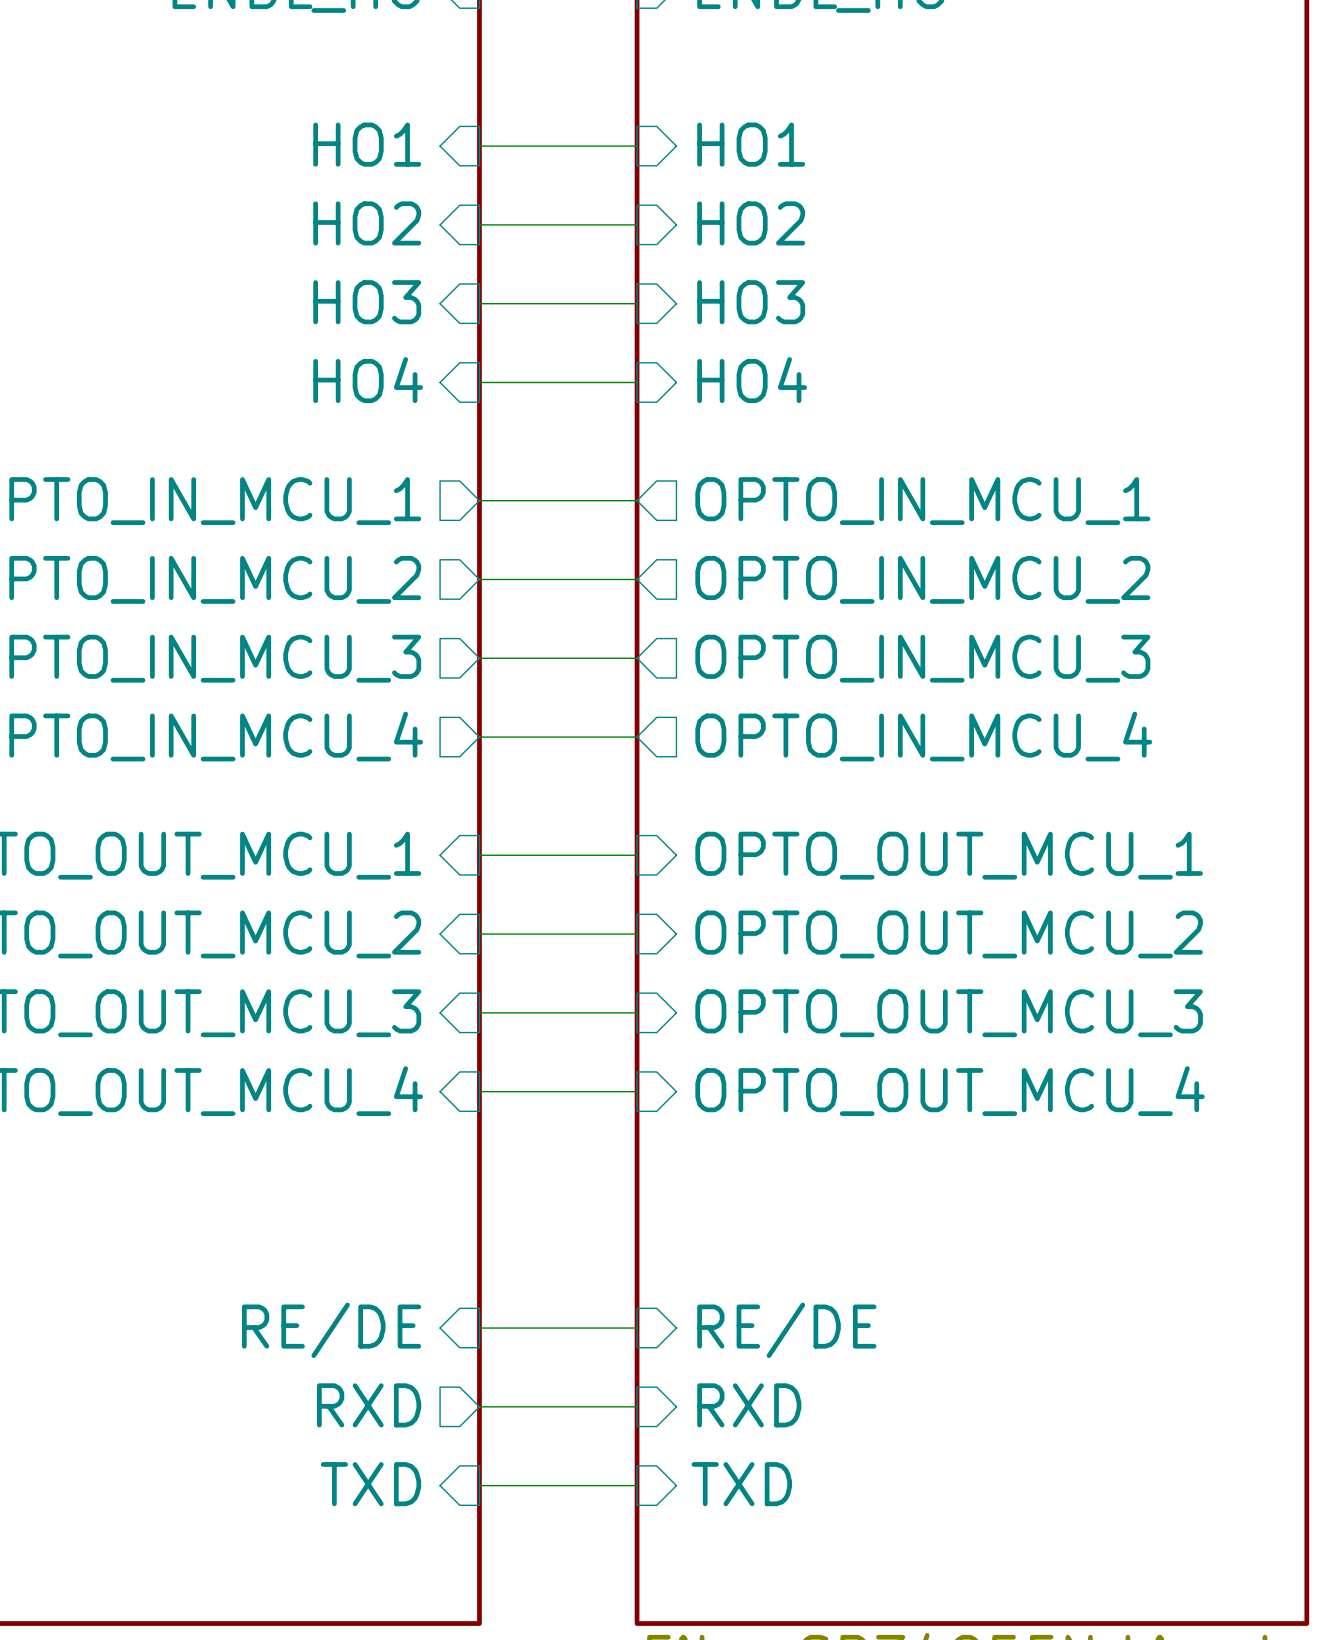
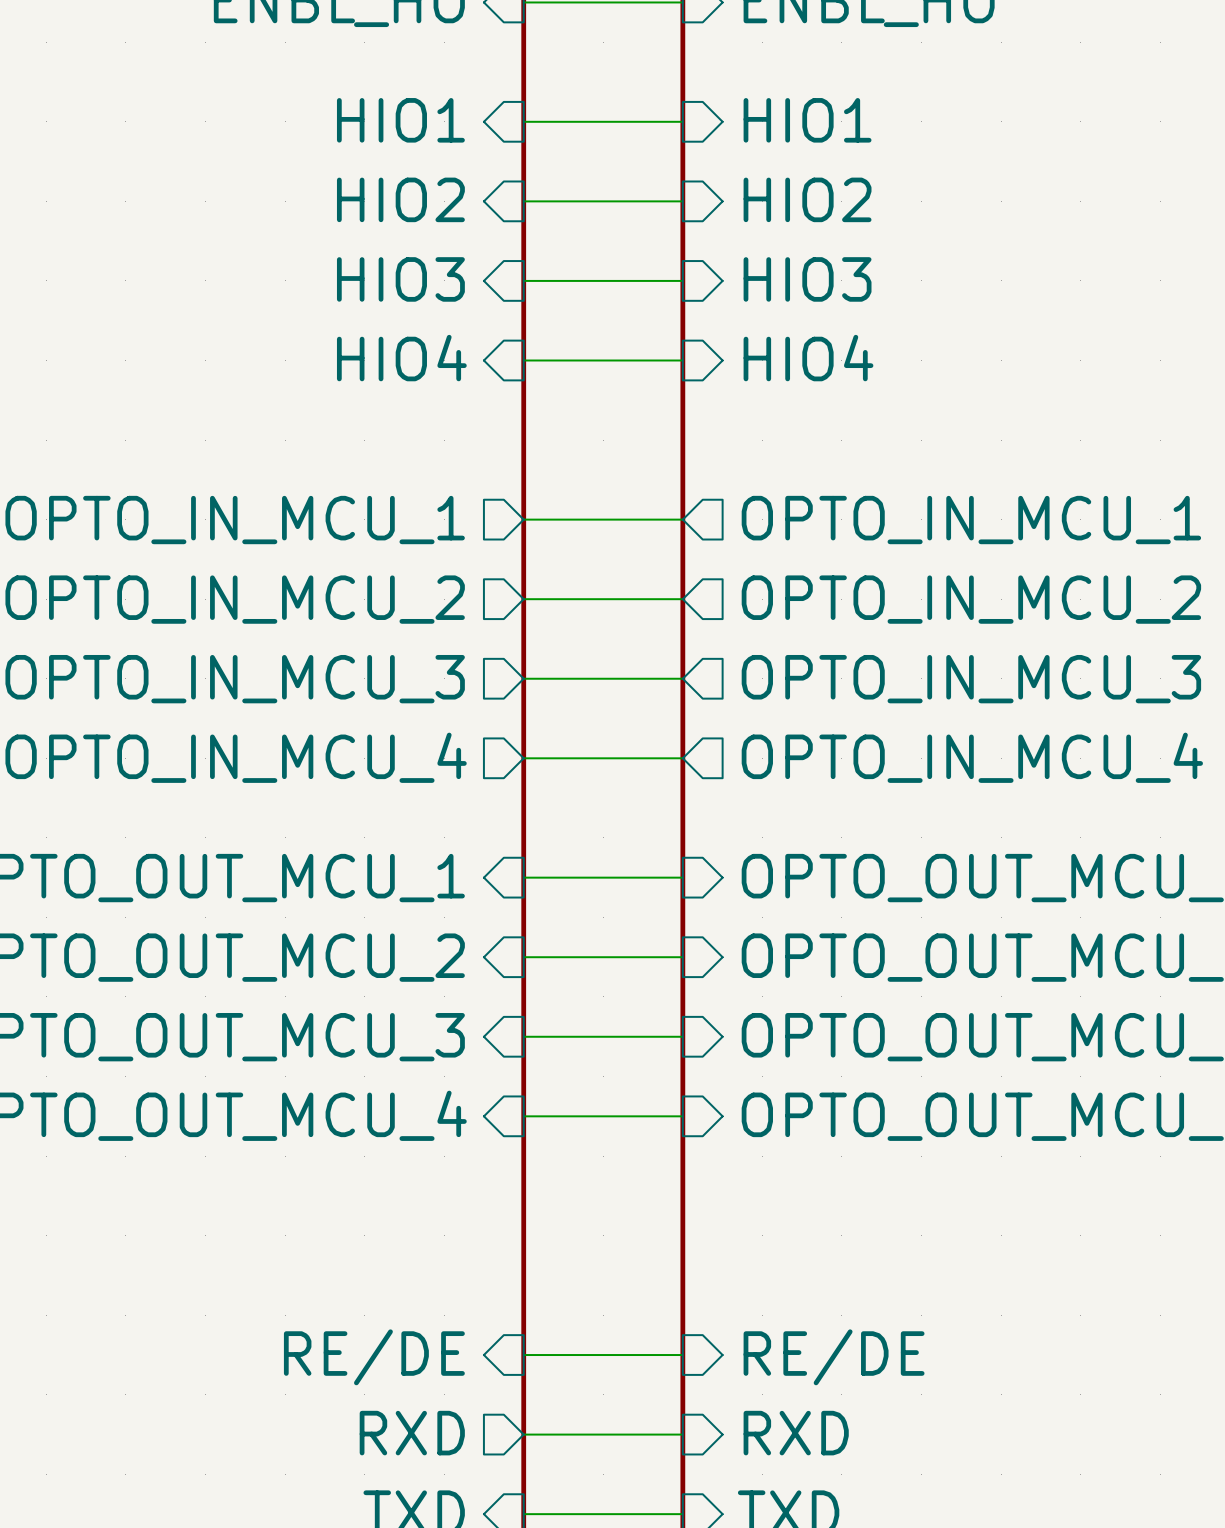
sheet pin: HO1 (367, 144) -> HIO1 (400, 120)
sheet pin: HO1 (751, 144) -> HIO1 (807, 120)
wire: (479, 146) (637, 146) -> (523, 121) (682, 121)
sheet pin: HO2 (367, 223) -> HIO2 (400, 199)
sheet pin: HO2 (751, 223) -> HIO2 (807, 199)
wire: (479, 224) (637, 224) -> (523, 201) (682, 201)
sheet pin: HO3 (367, 302) -> HIO3 (400, 279)
sheet pin: HO3 (751, 302) -> HIO3 (807, 279)
wire: (479, 303) (637, 303) -> (523, 280) (682, 280)
sheet pin: HO4 (368, 380) -> HIO4 (401, 358)
sheet pin: HO4 (752, 380) -> HIO4 (808, 358)
wire: (479, 382) (637, 382) -> (523, 360) (682, 360)

